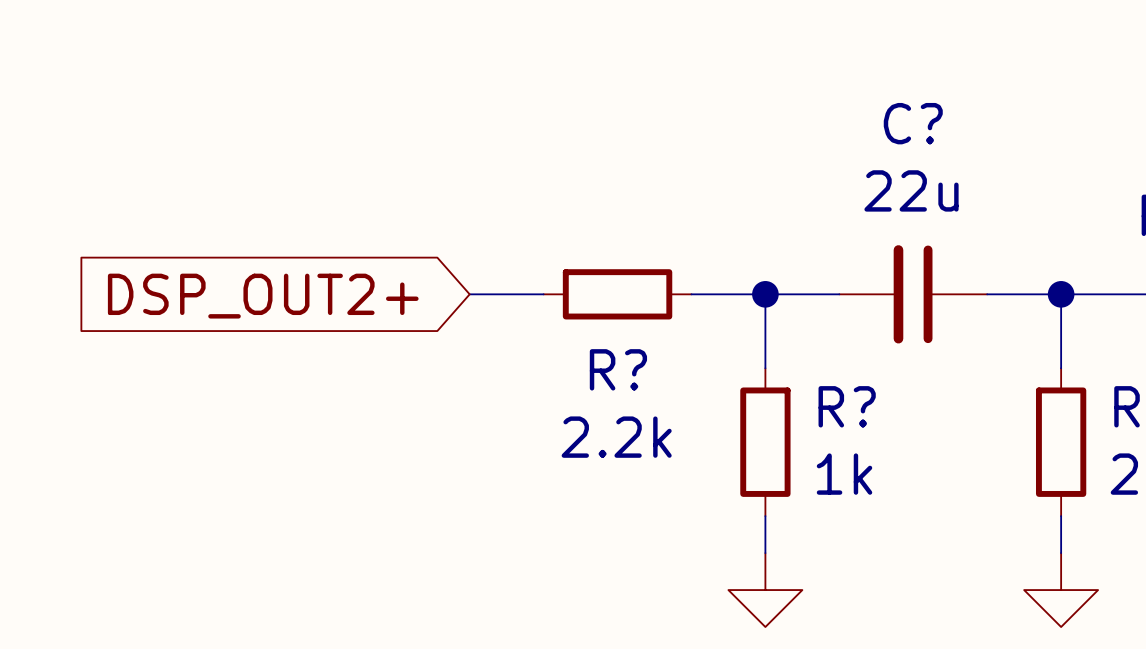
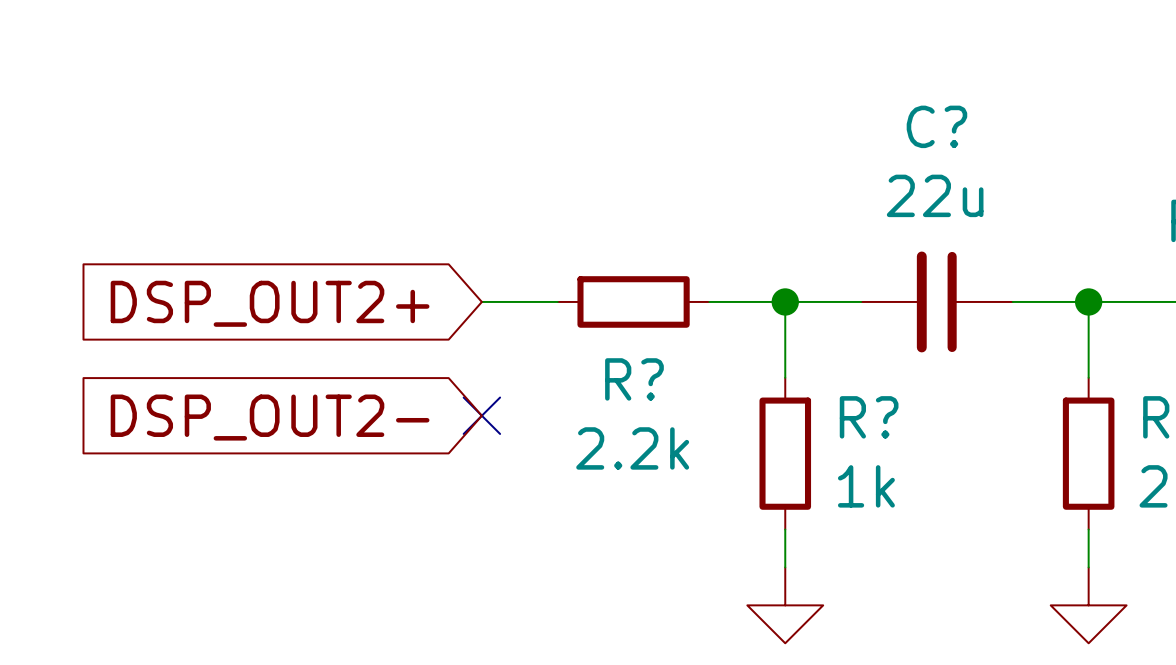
no-connect mark: none -> (481, 415)
global label: none -> DSP_OUT2- (270, 417)

